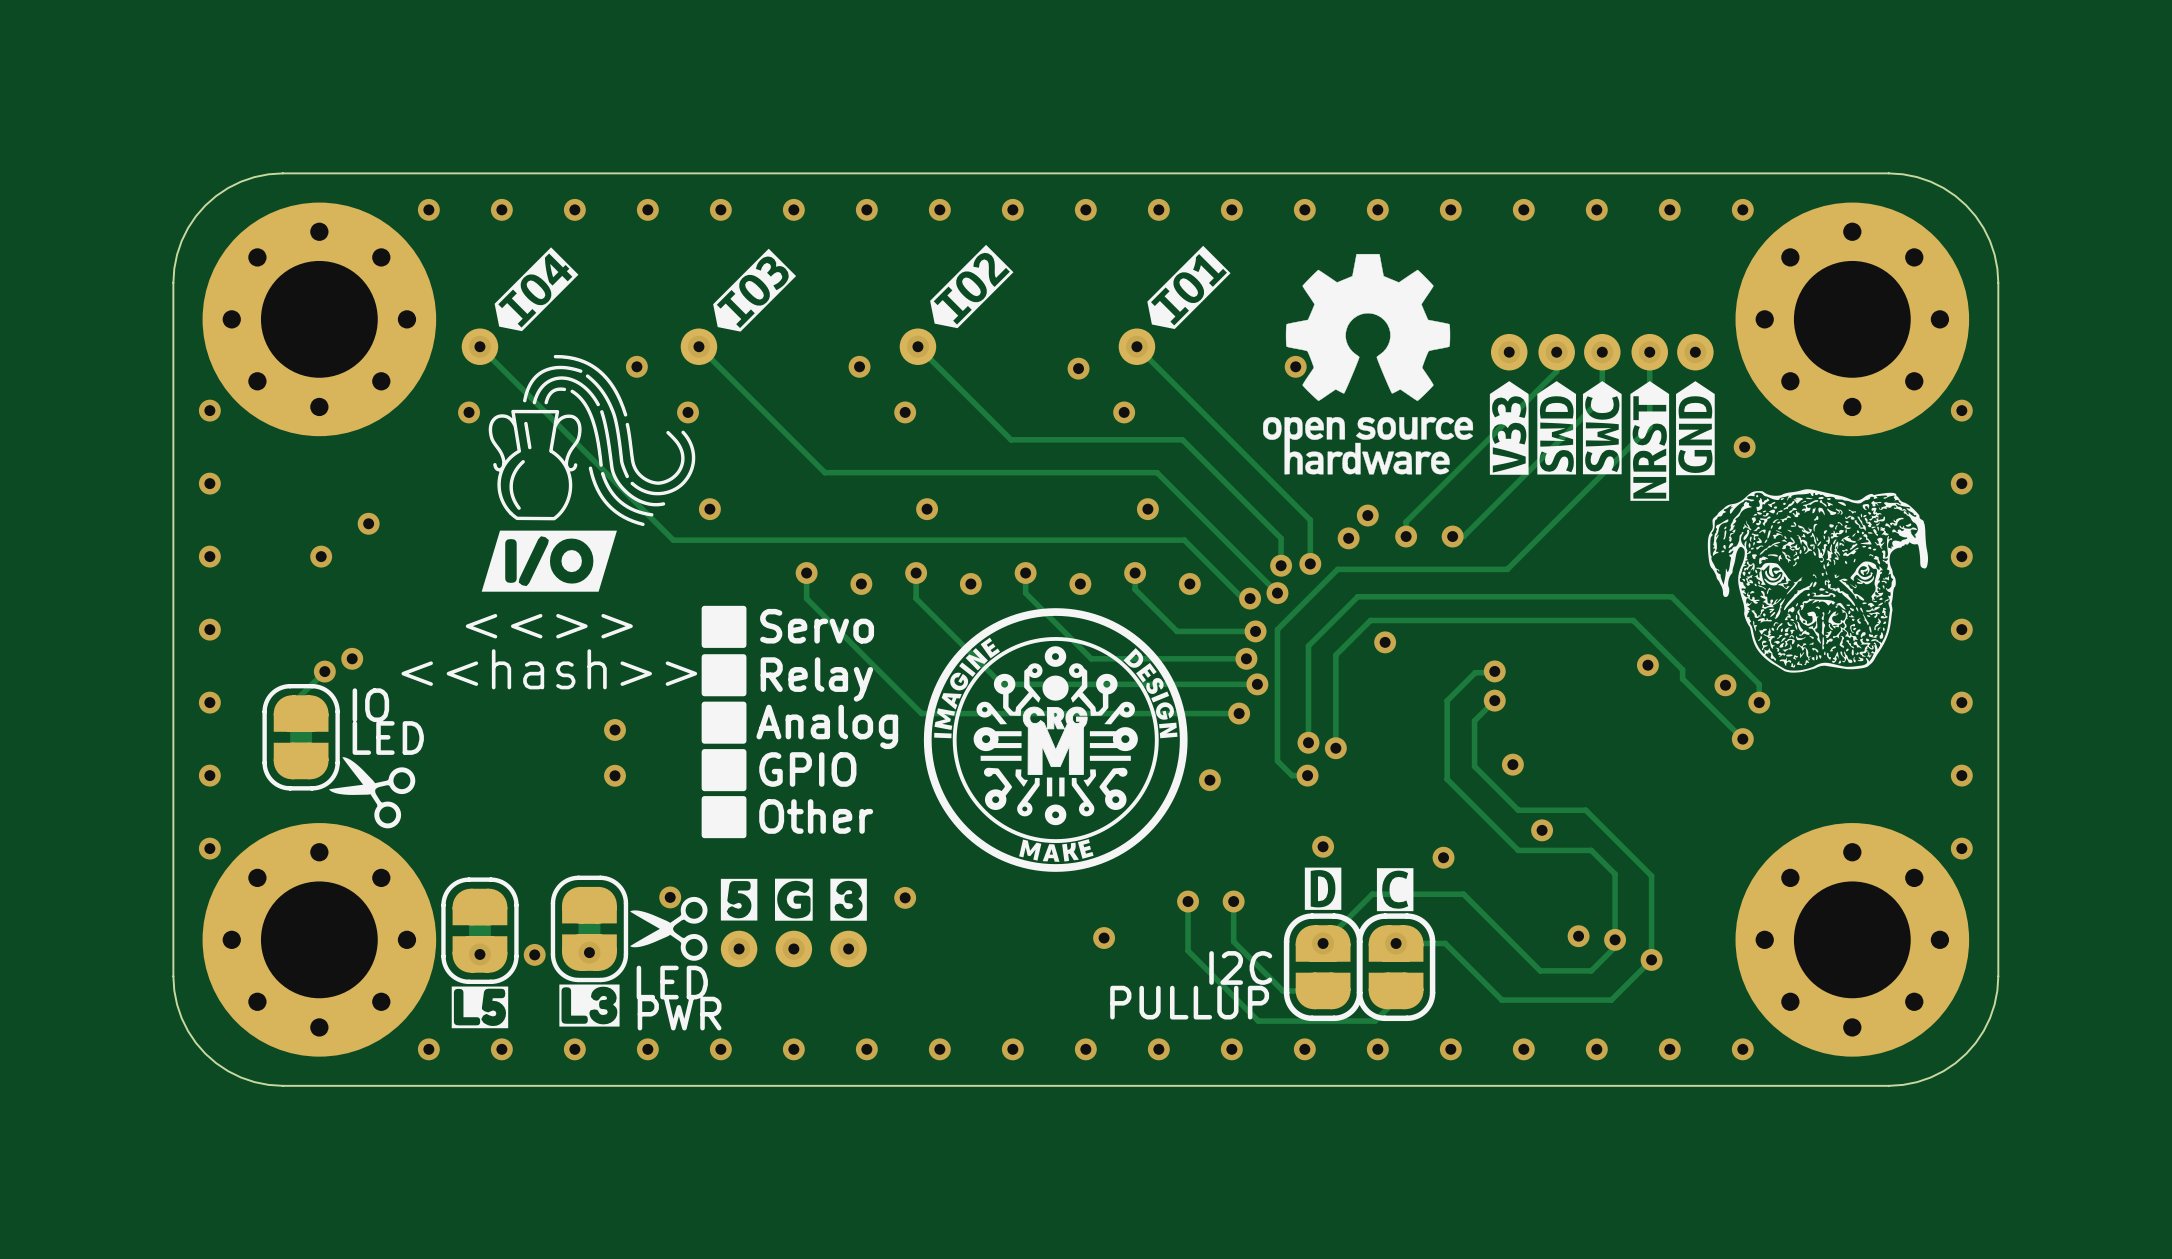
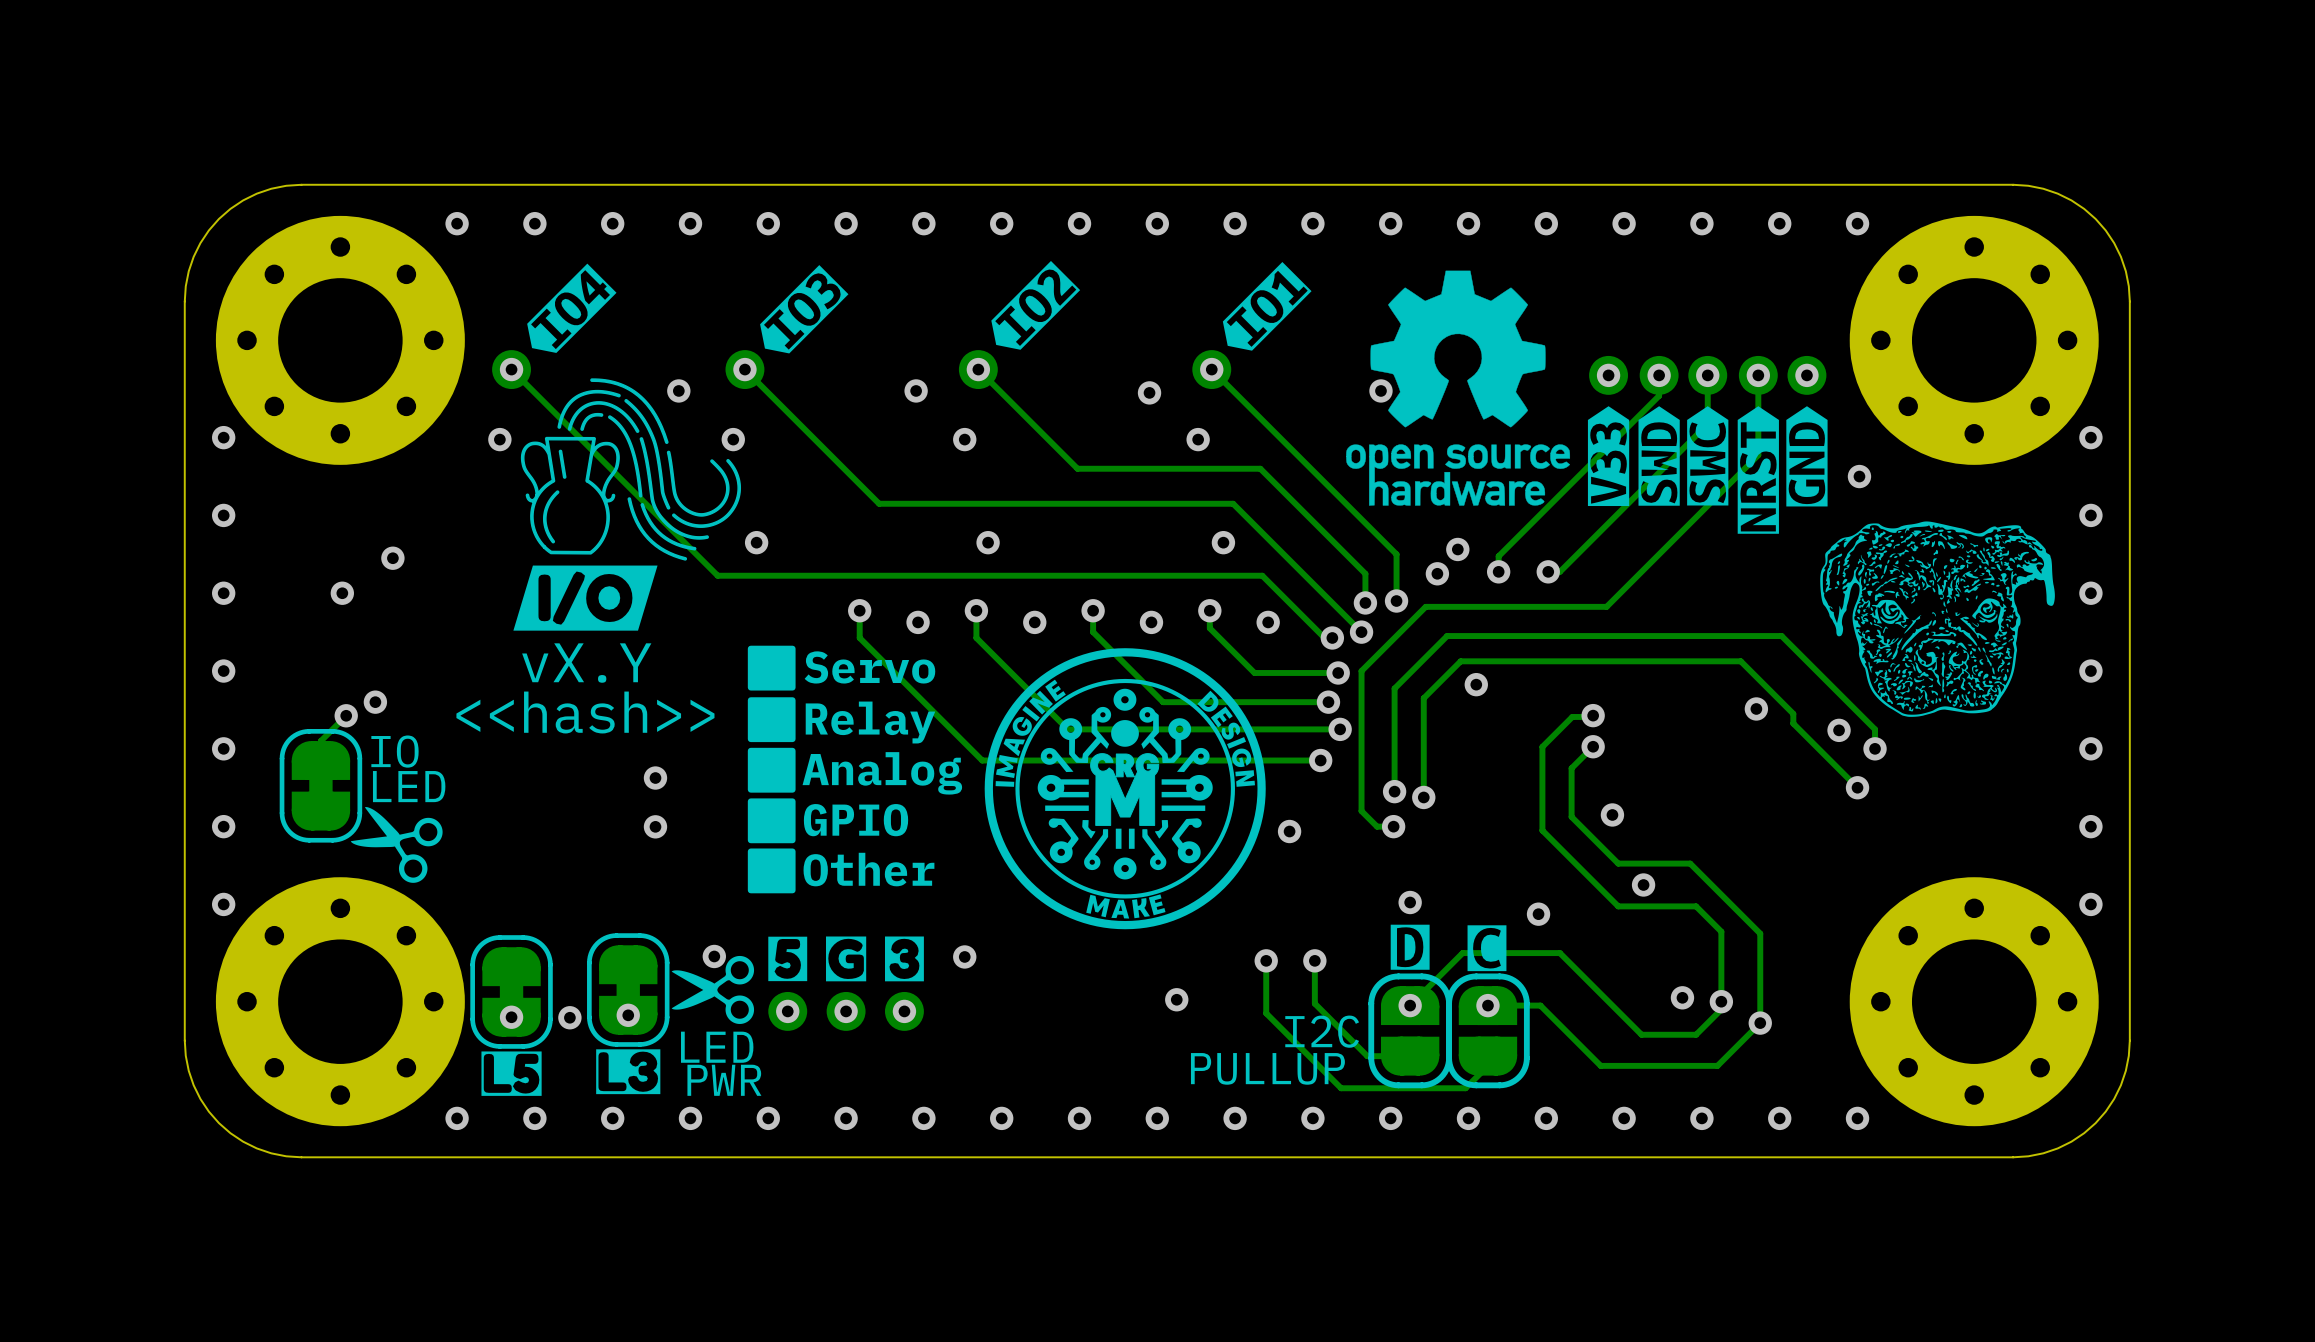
text: <<>> (549, 626) -> vX.Y (586, 663)

